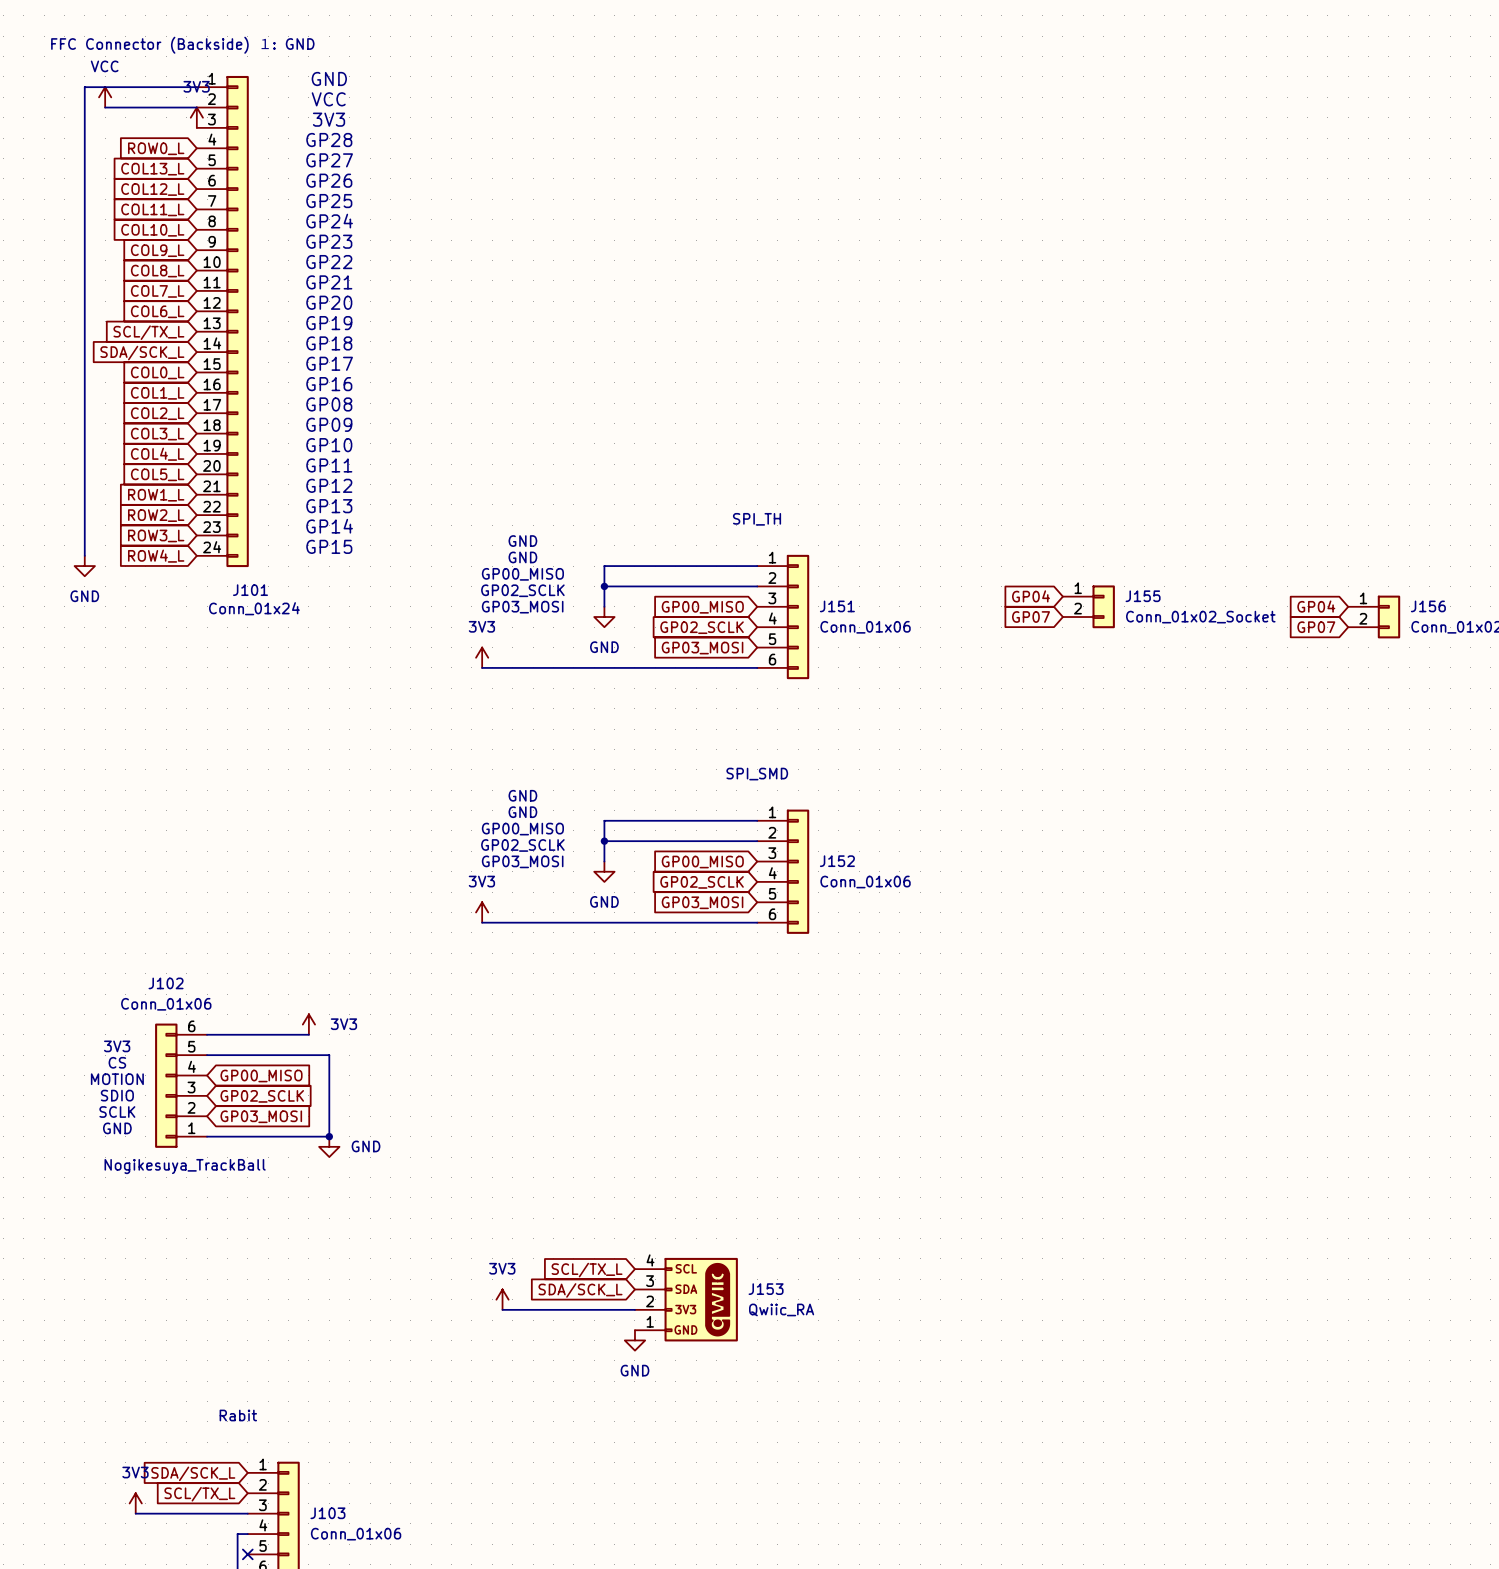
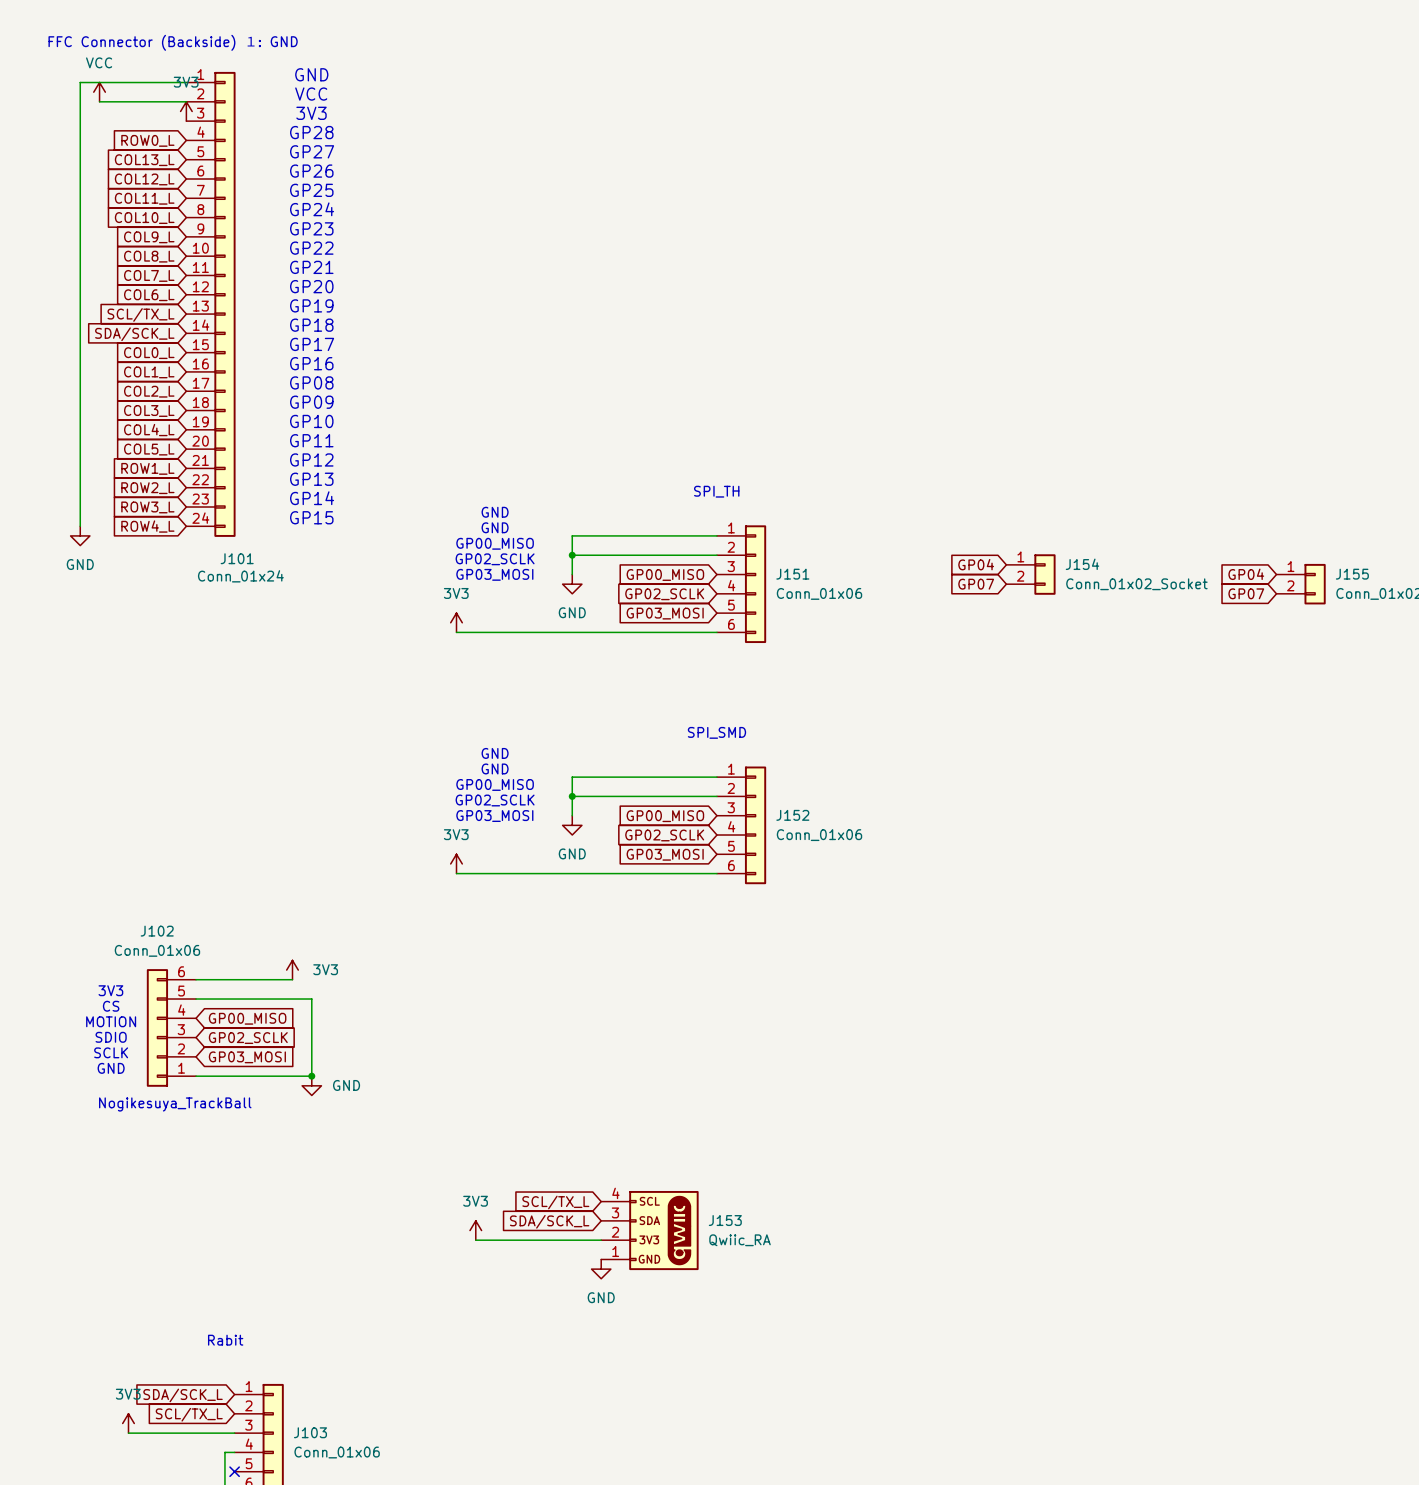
J155 name: J155 (1143, 596) -> J154 (1082, 564)
J156 name: J156 (1428, 606) -> J155 (1352, 574)

